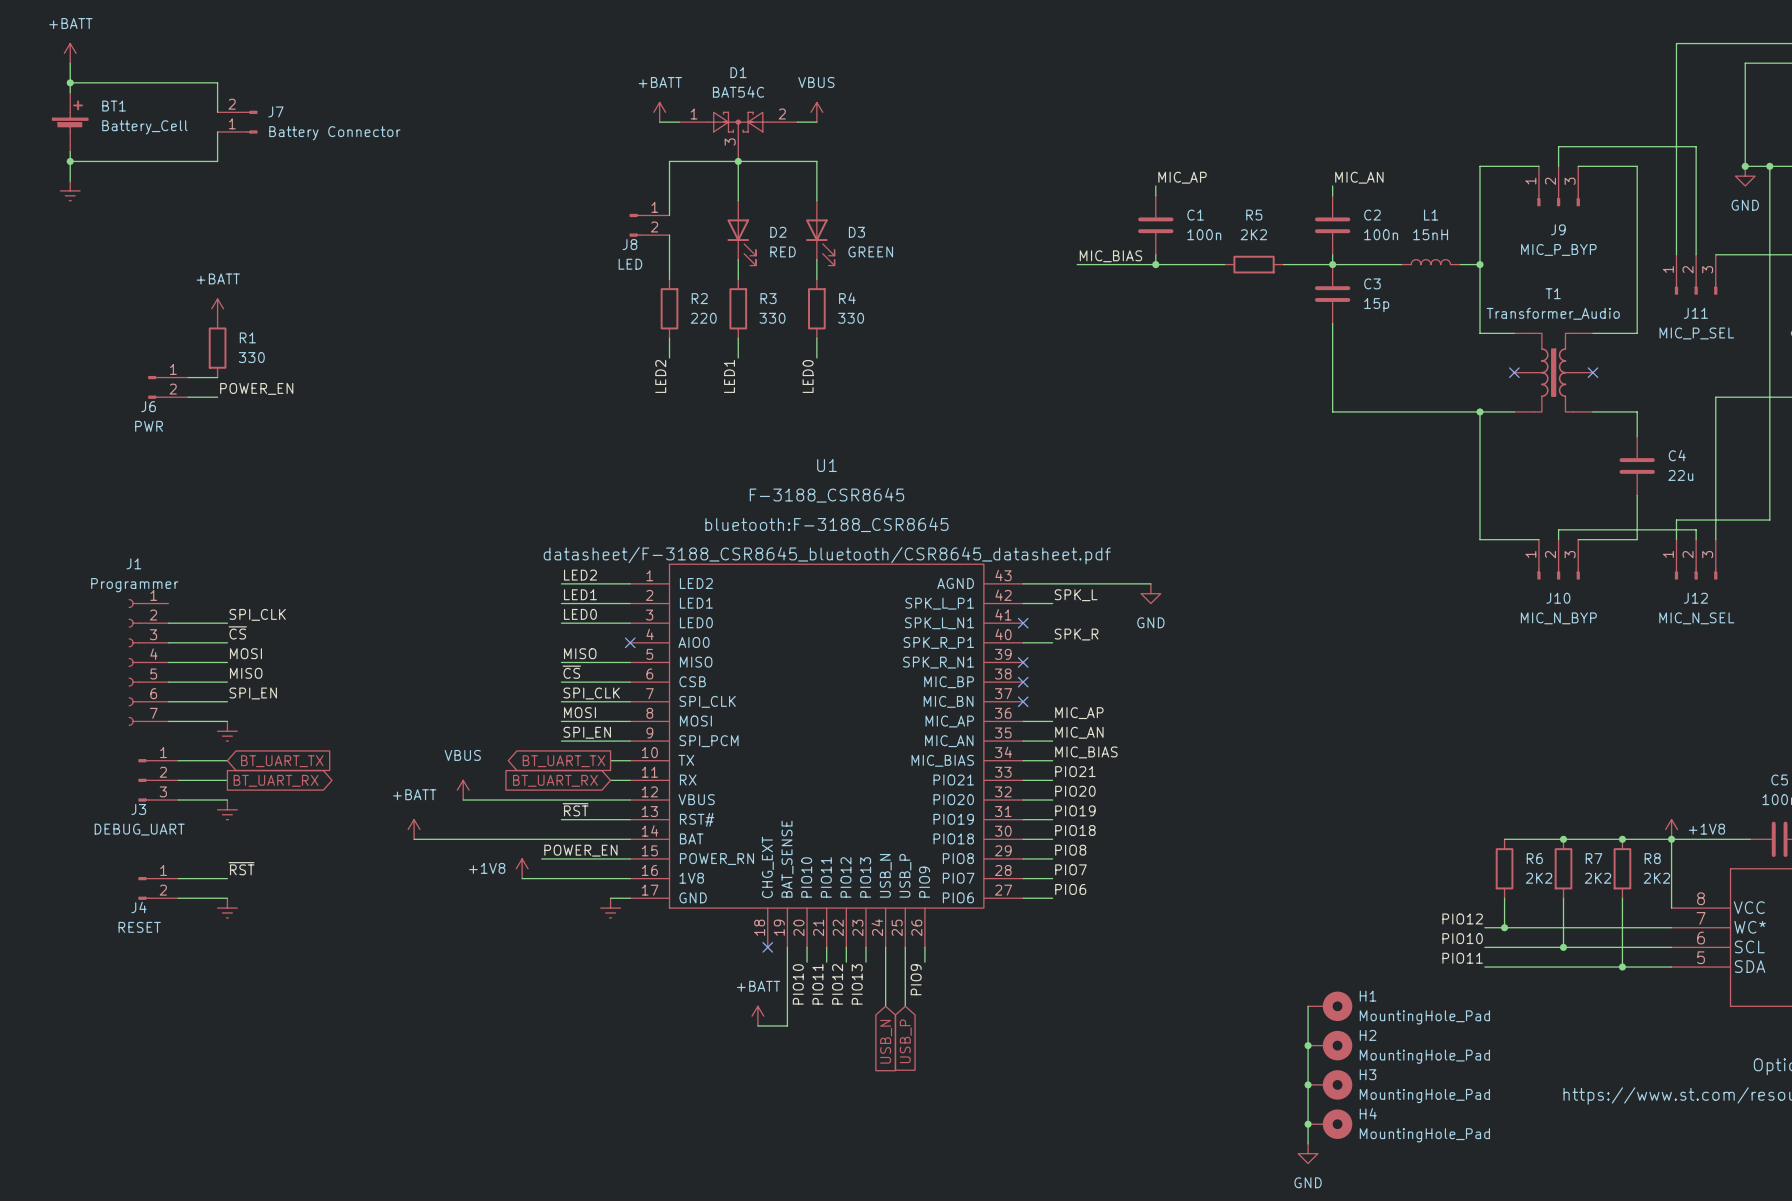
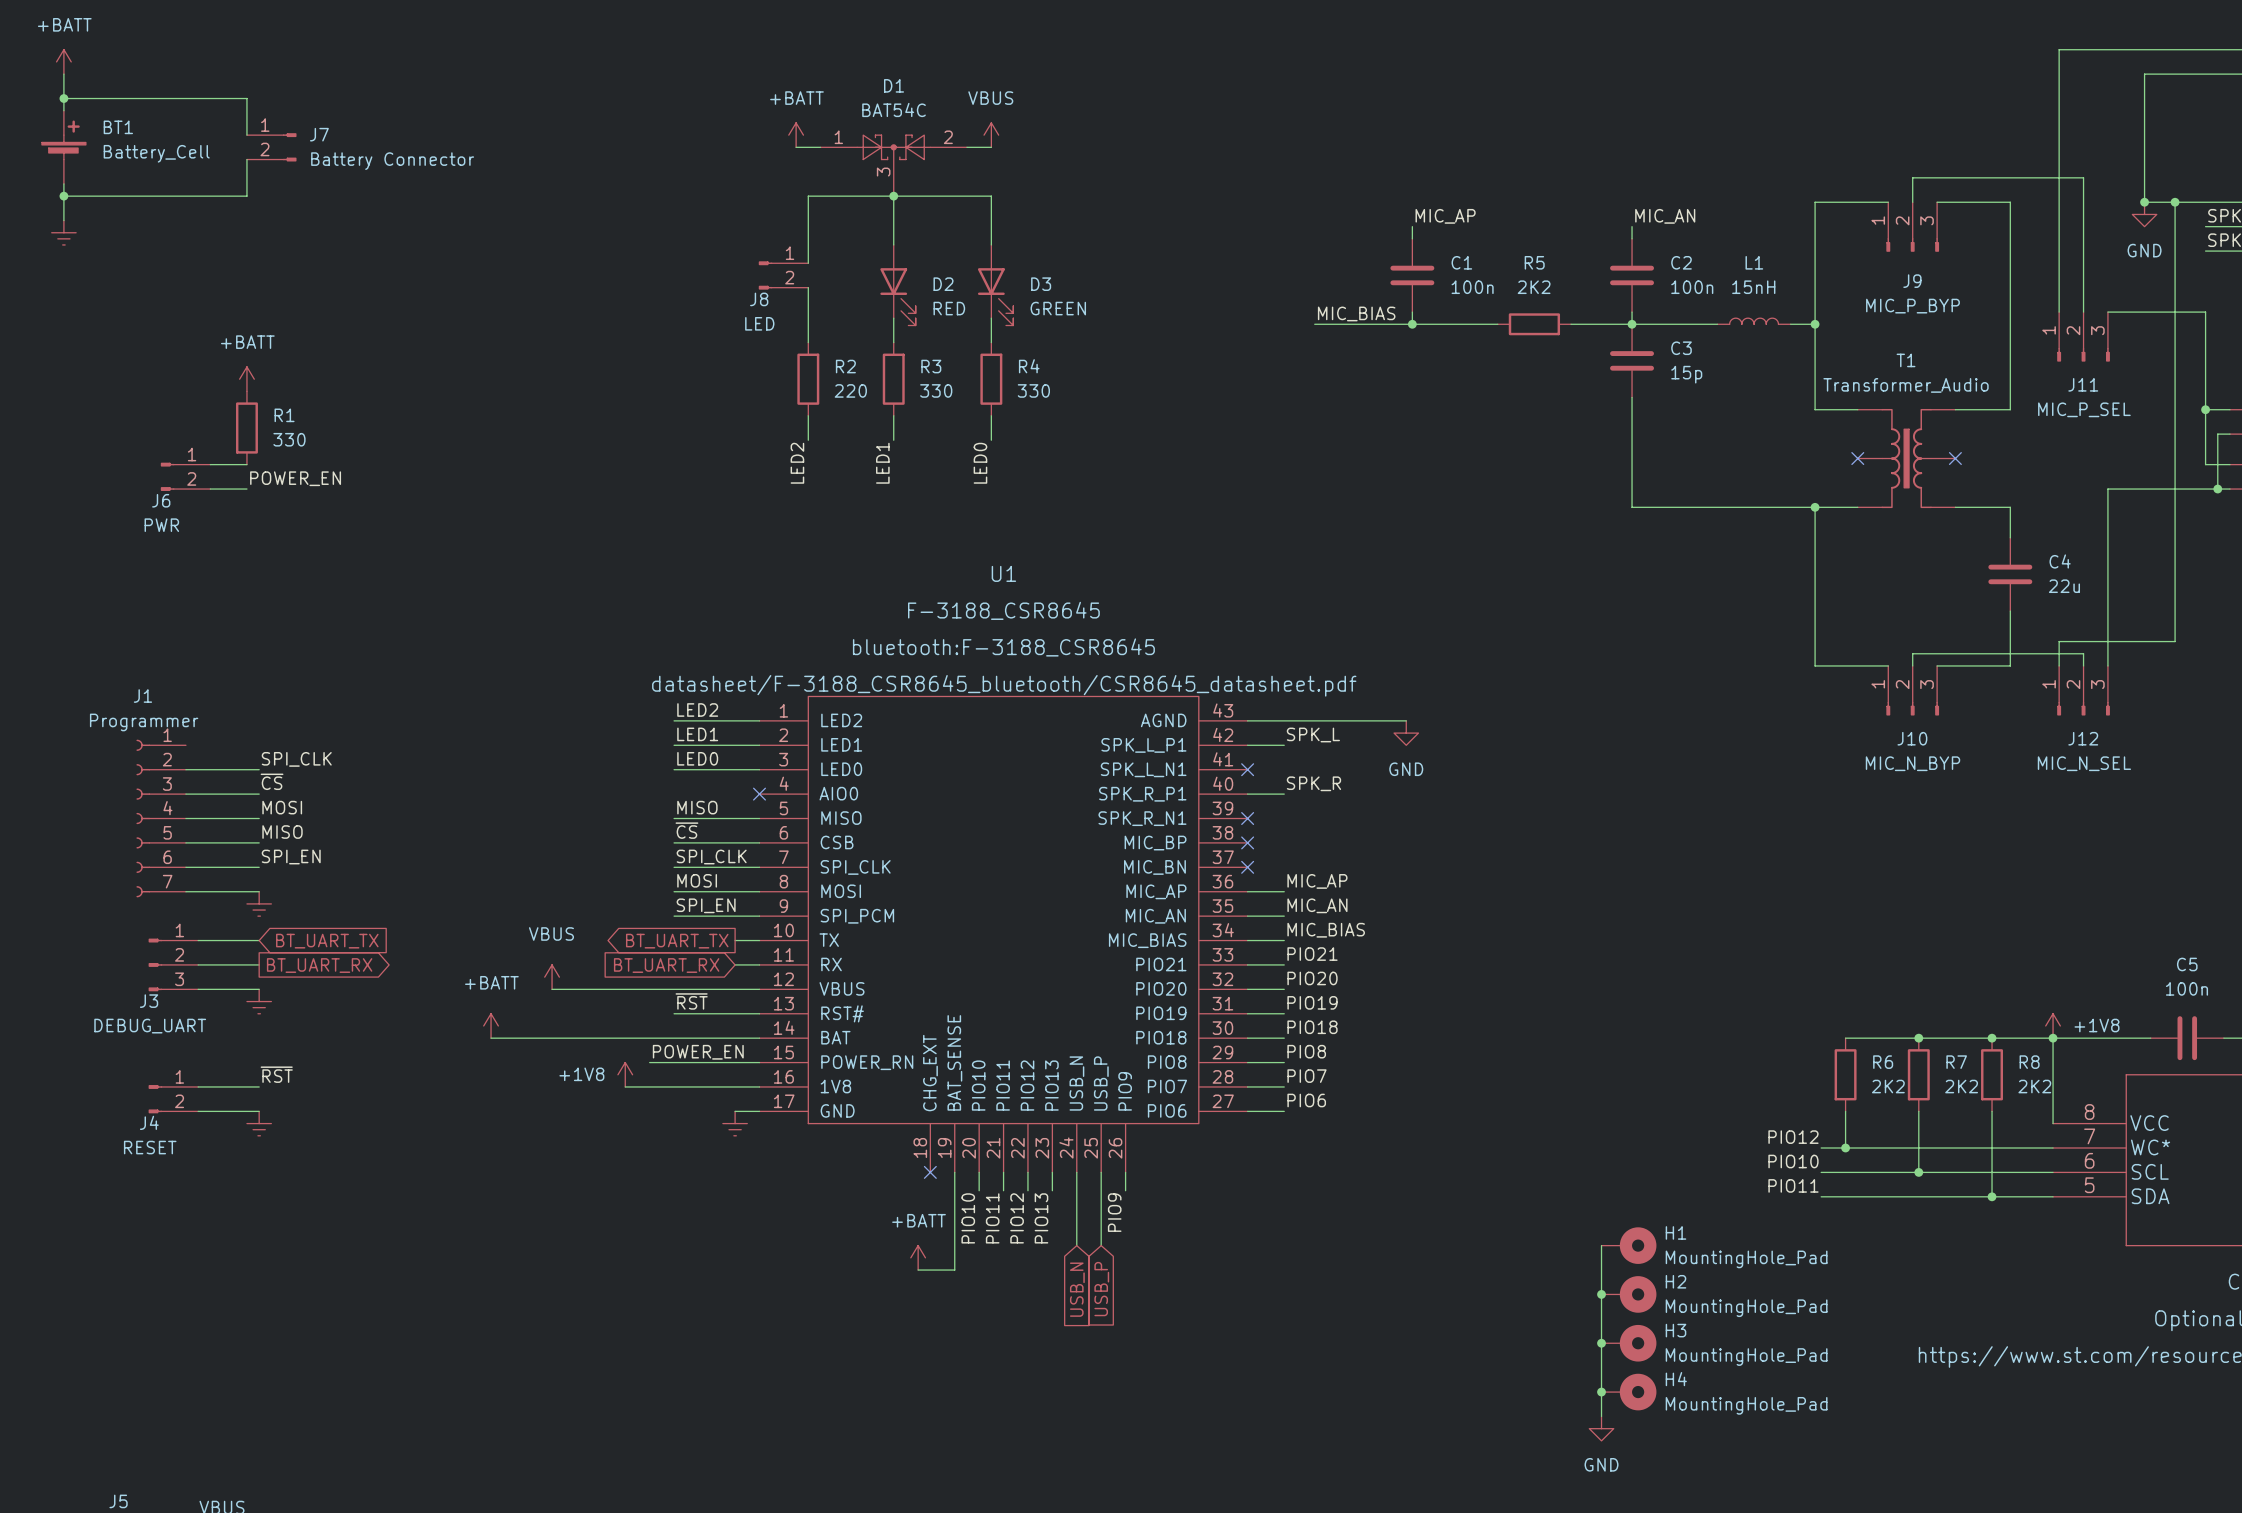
J7 flip: as is (251, 122) -> up-down (289, 147)

